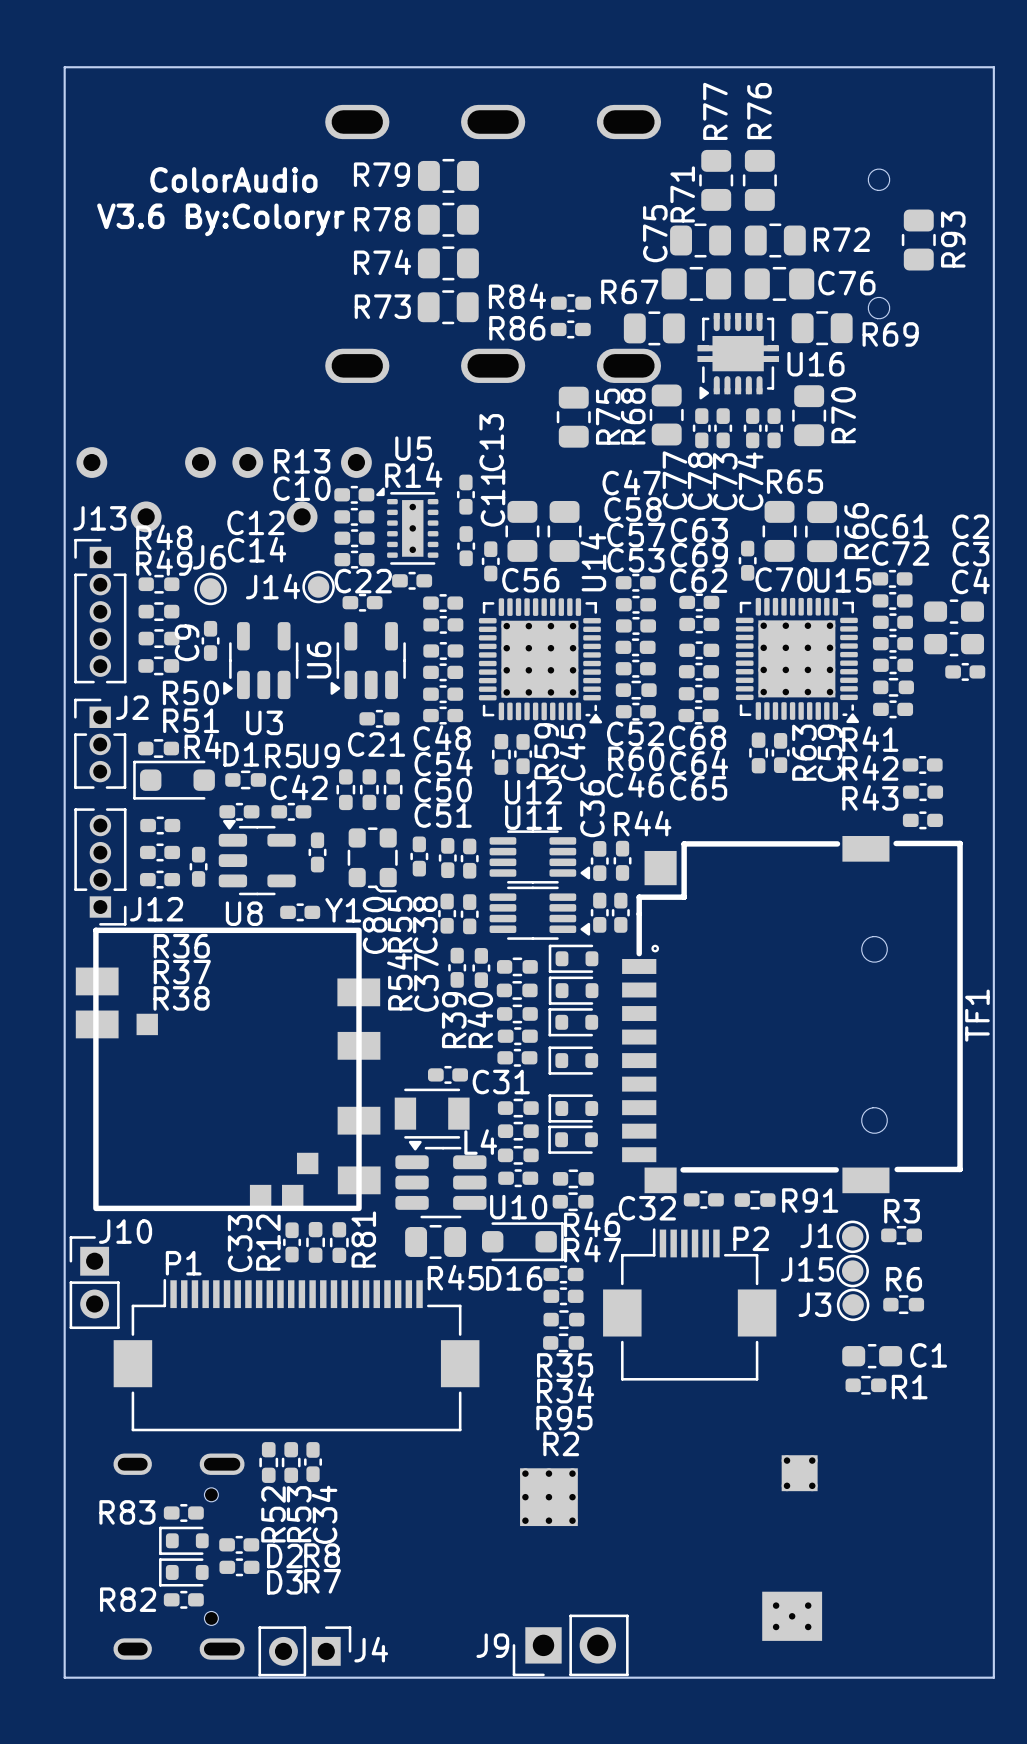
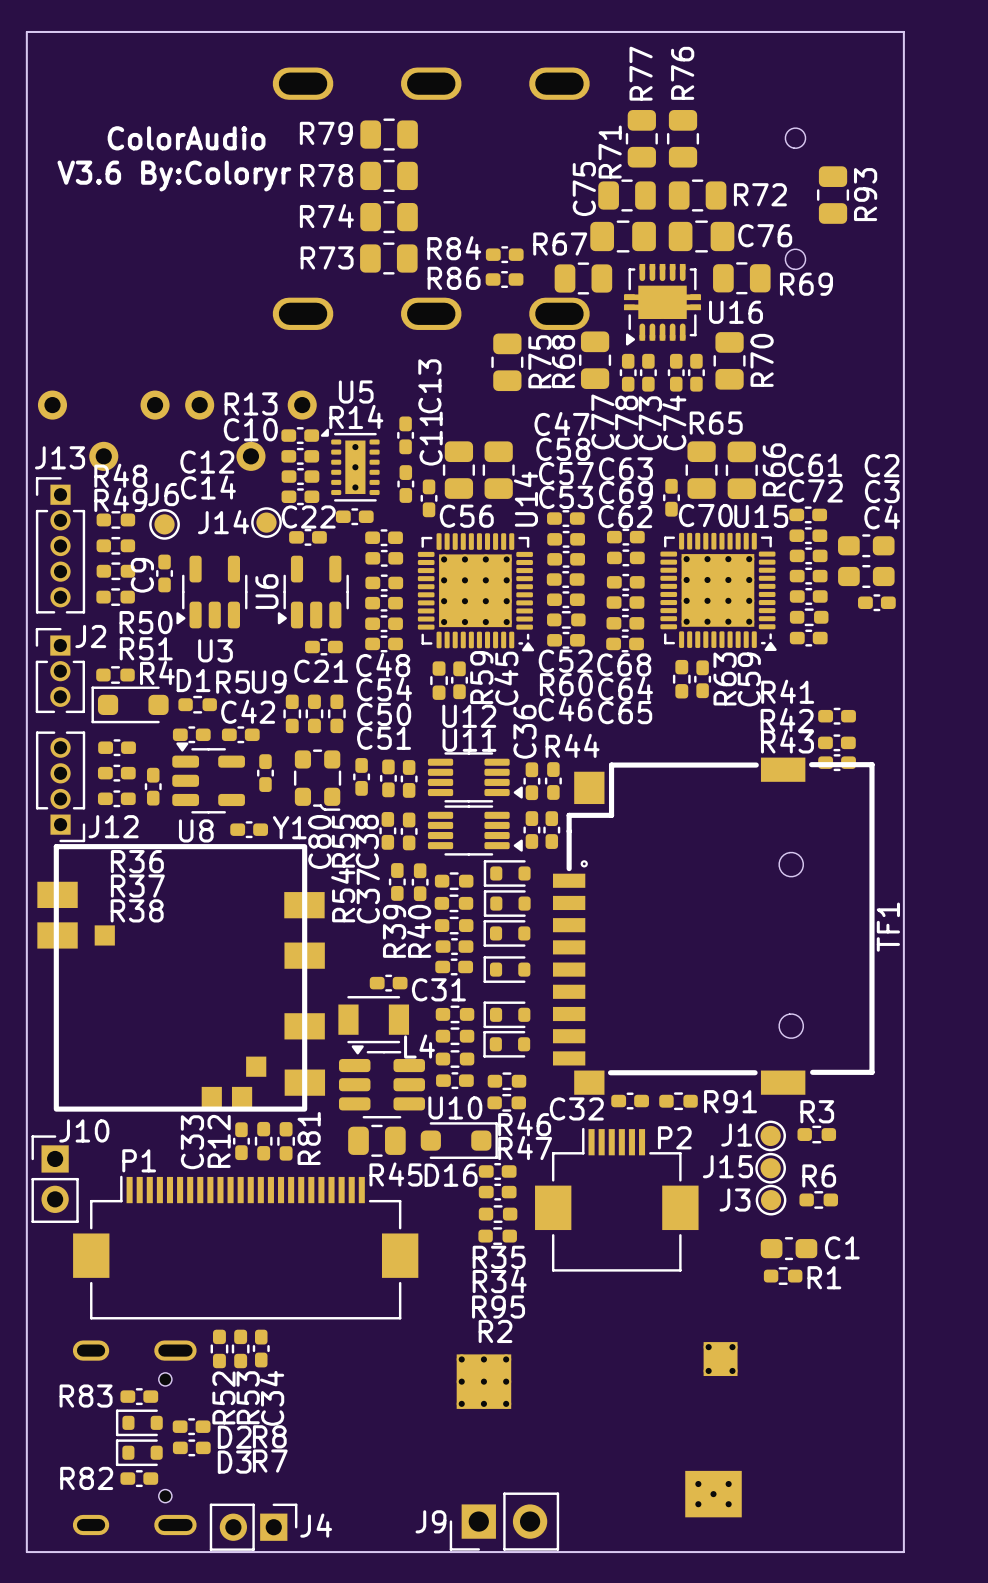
R41: (922, 764) -> none
R42 name: R42 (870, 767) -> R41 (787, 691)
R43 name: R43 (870, 797) -> R42 (787, 720)
R43: none -> (837, 762)

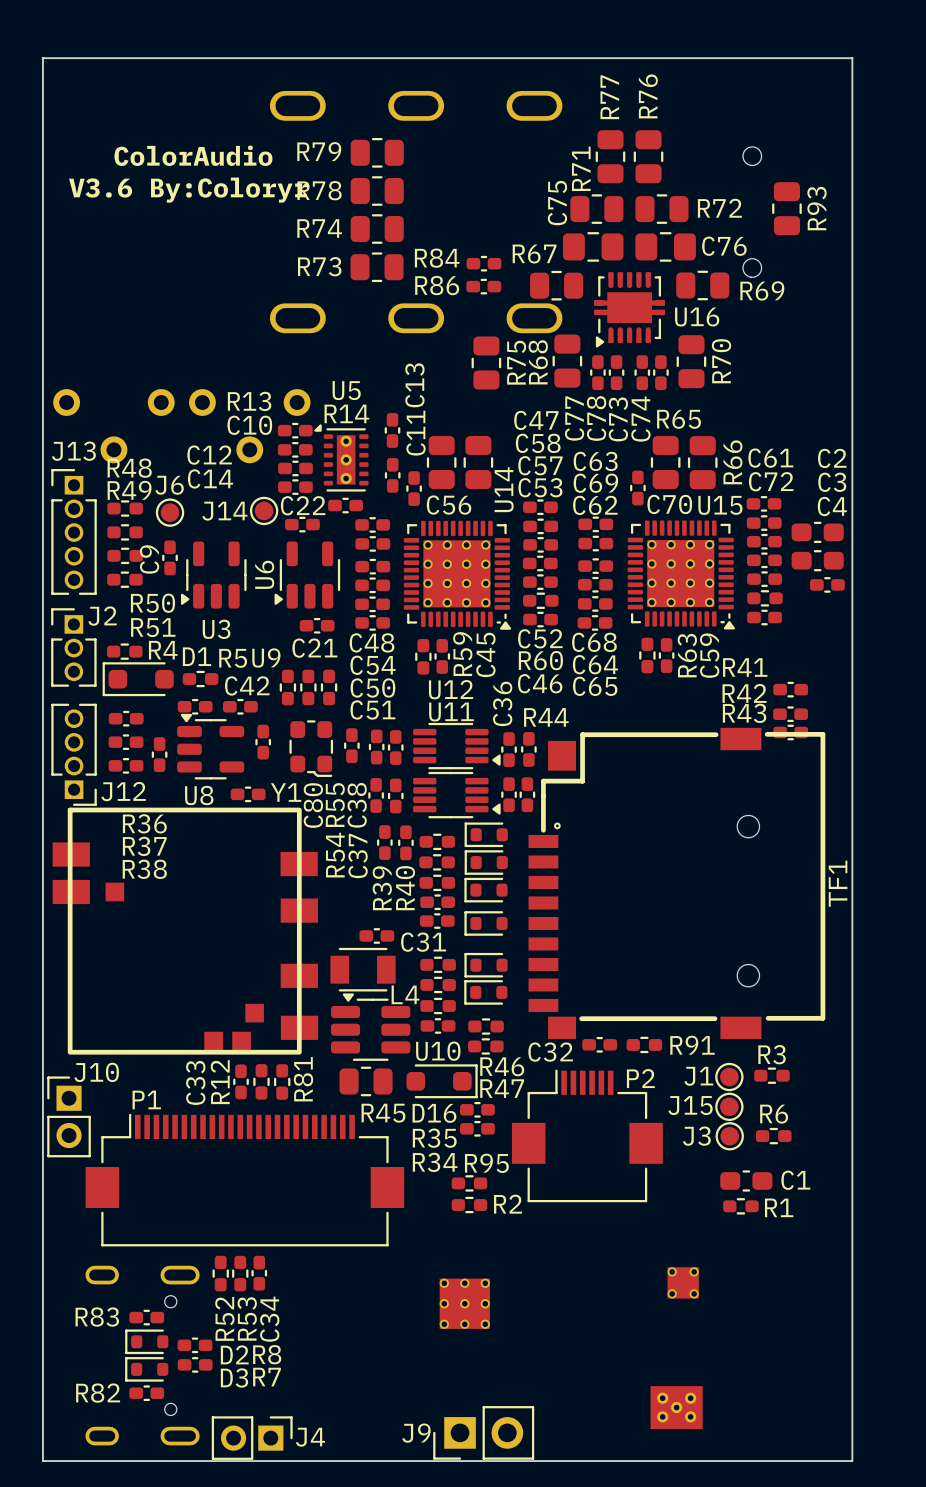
R95 position: (498, 1214) -> (469, 1183)
R2 position: (497, 1236) -> (469, 1205)
R35 name position: R35 (499, 1257) -> R35 (434, 1138)
R34 name position: R34 (499, 1281) -> R34 (435, 1162)
R95 name position: R95 (498, 1307) -> R95 (486, 1163)
R2 name position: R2 (495, 1331) -> R2 (508, 1204)

